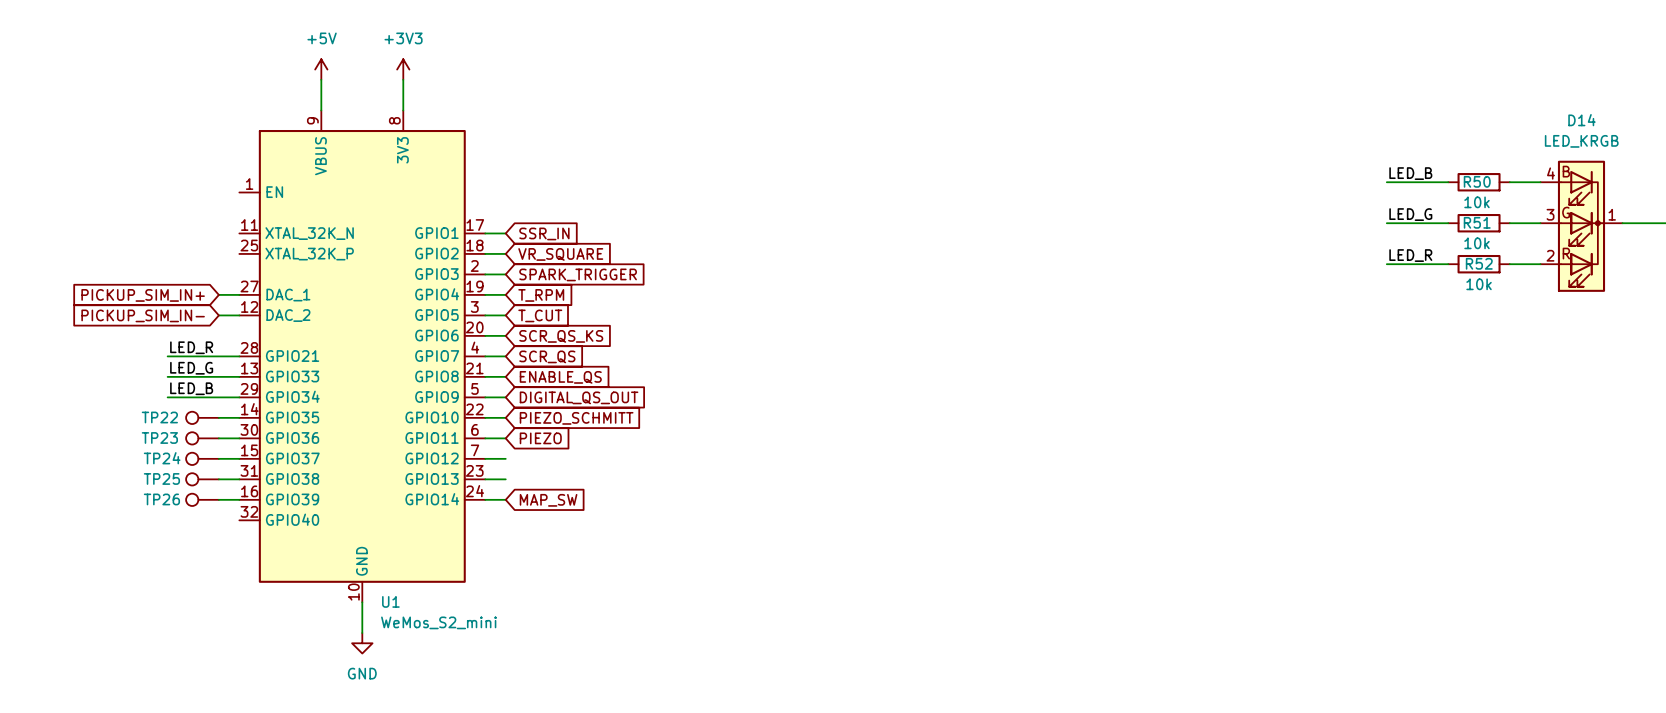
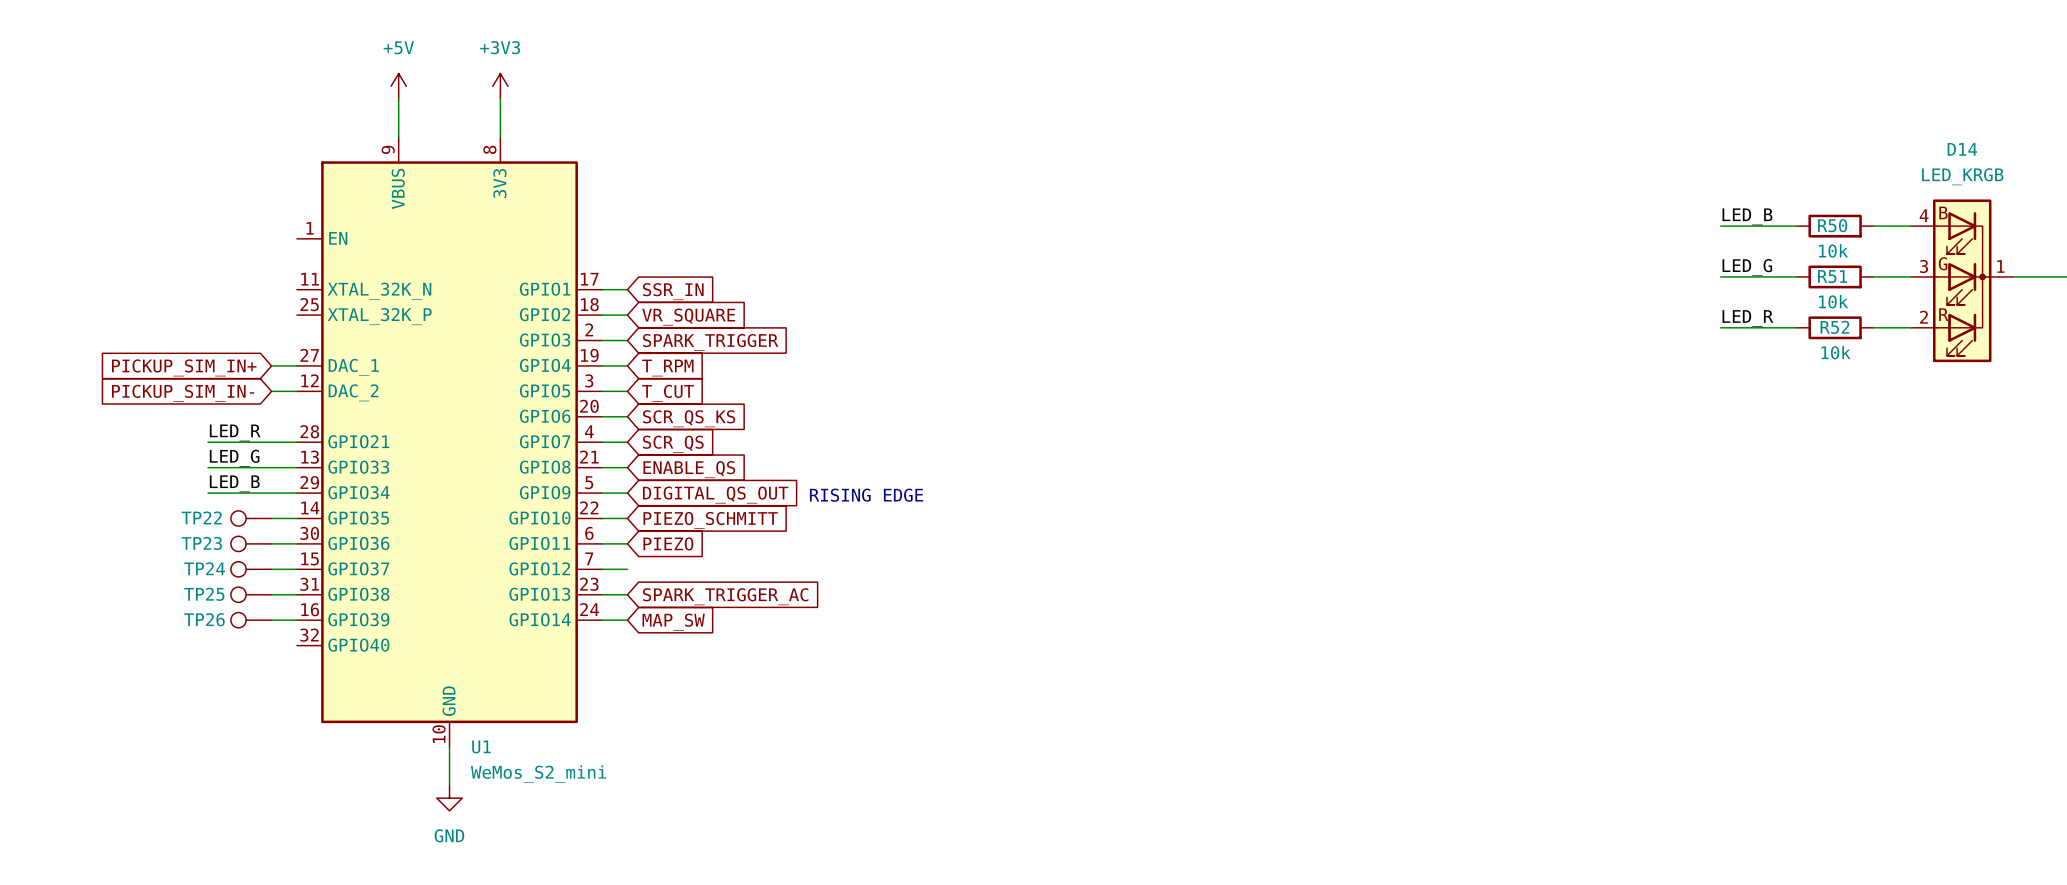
text: none -> RISING EDGE (866, 495)
global label: none -> SPARK_TRIGGER_AC (725, 596)

